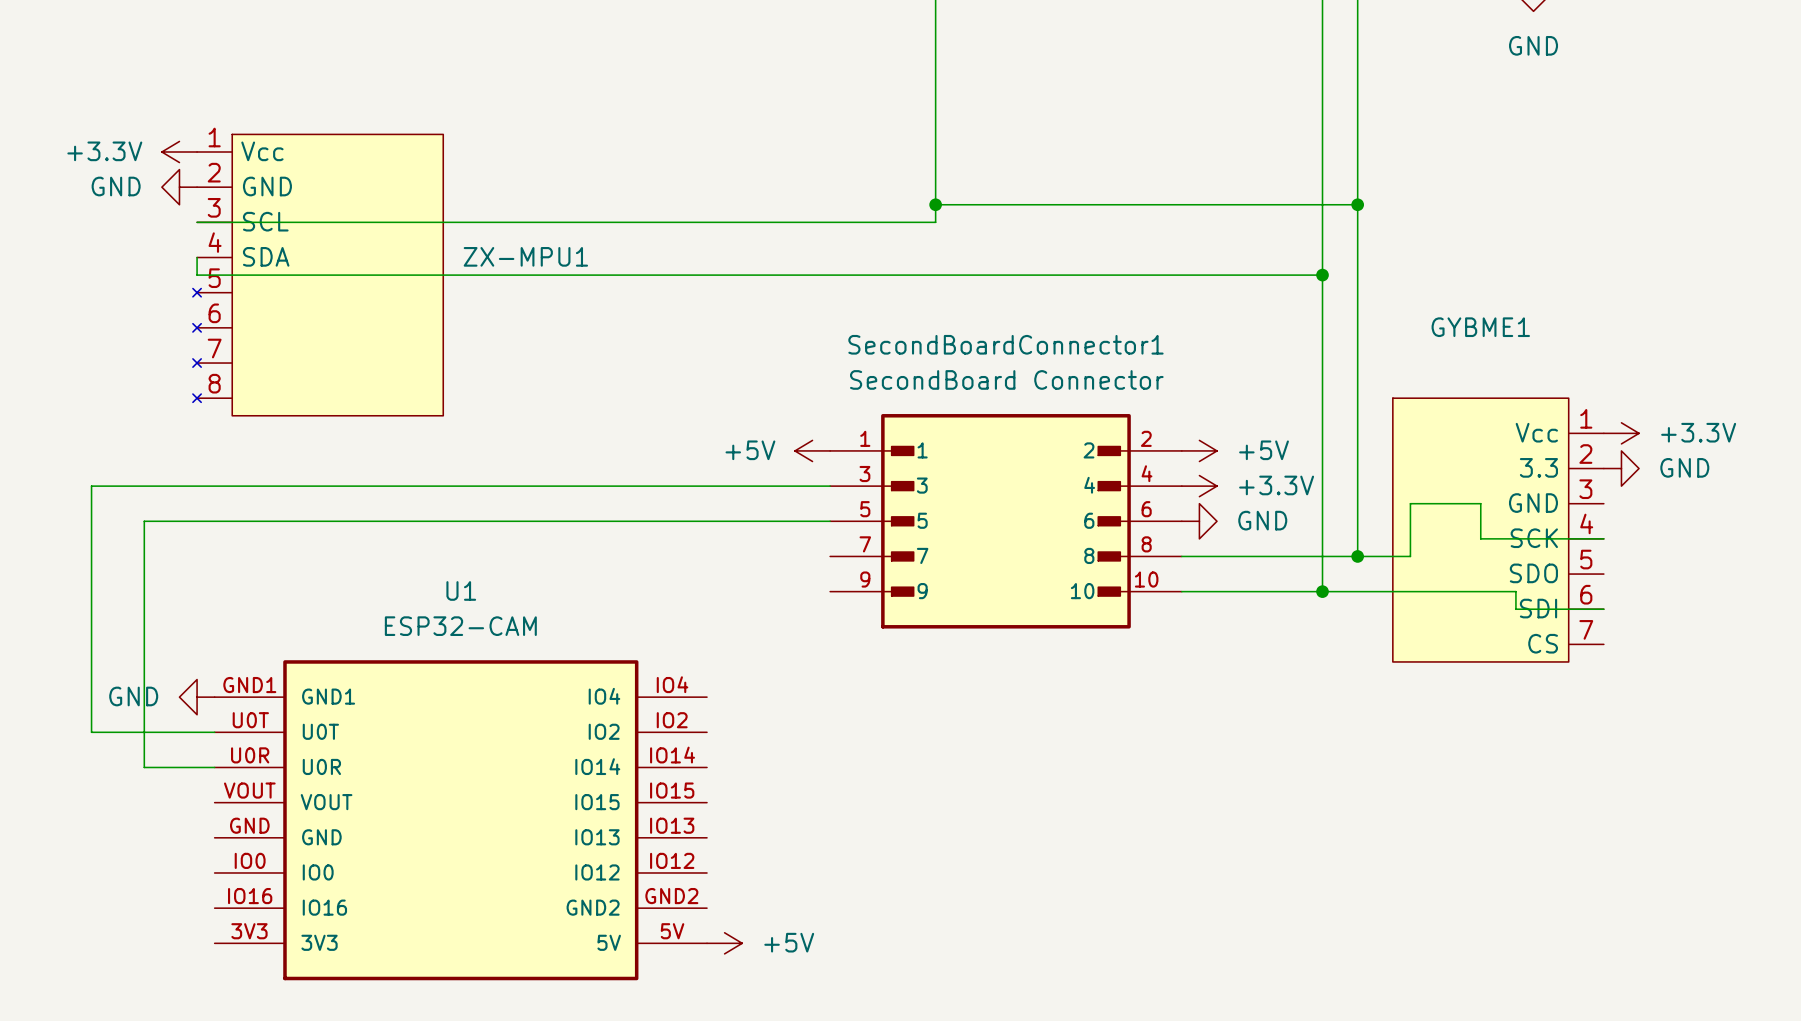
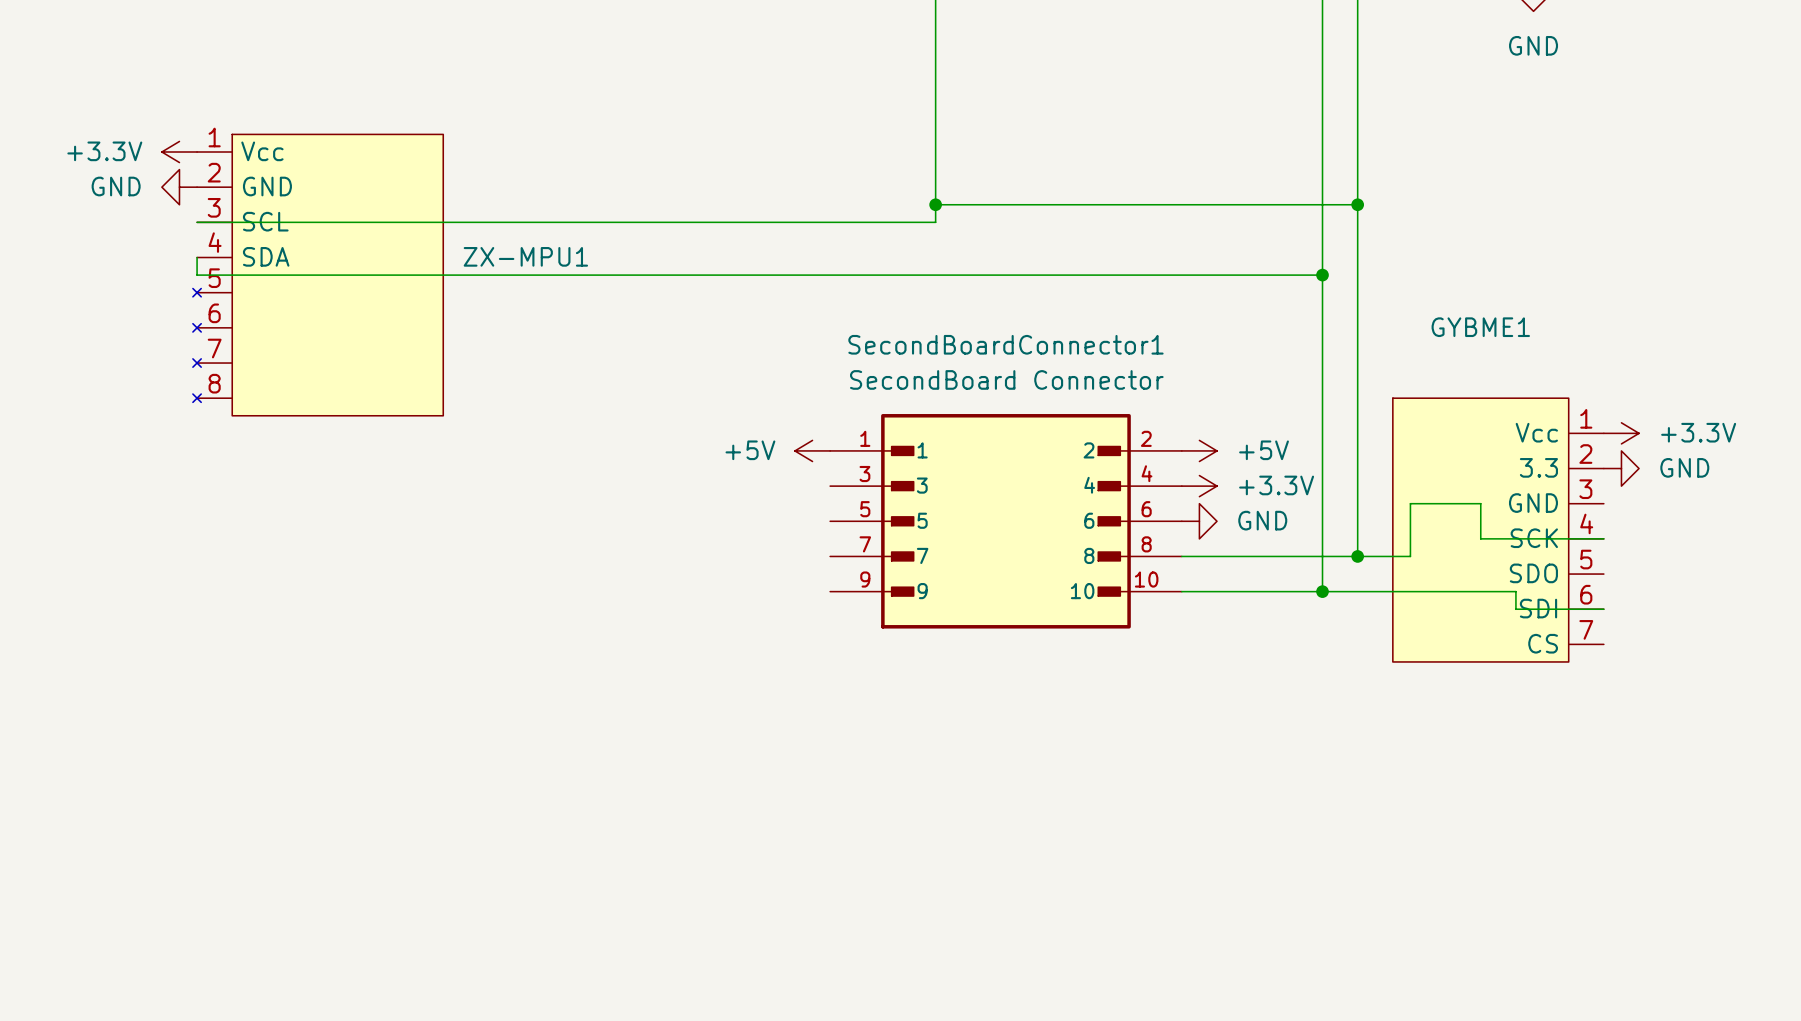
wire: (830, 486) (91, 486) (91, 732) (214, 732) -> none
wire: (830, 521) (144, 521) (144, 767) (214, 767) -> none
power symbol: GND (197, 697) -> none
U1: ESP32-CAM (460, 820) -> none
power symbol: +5V (724, 943) -> none

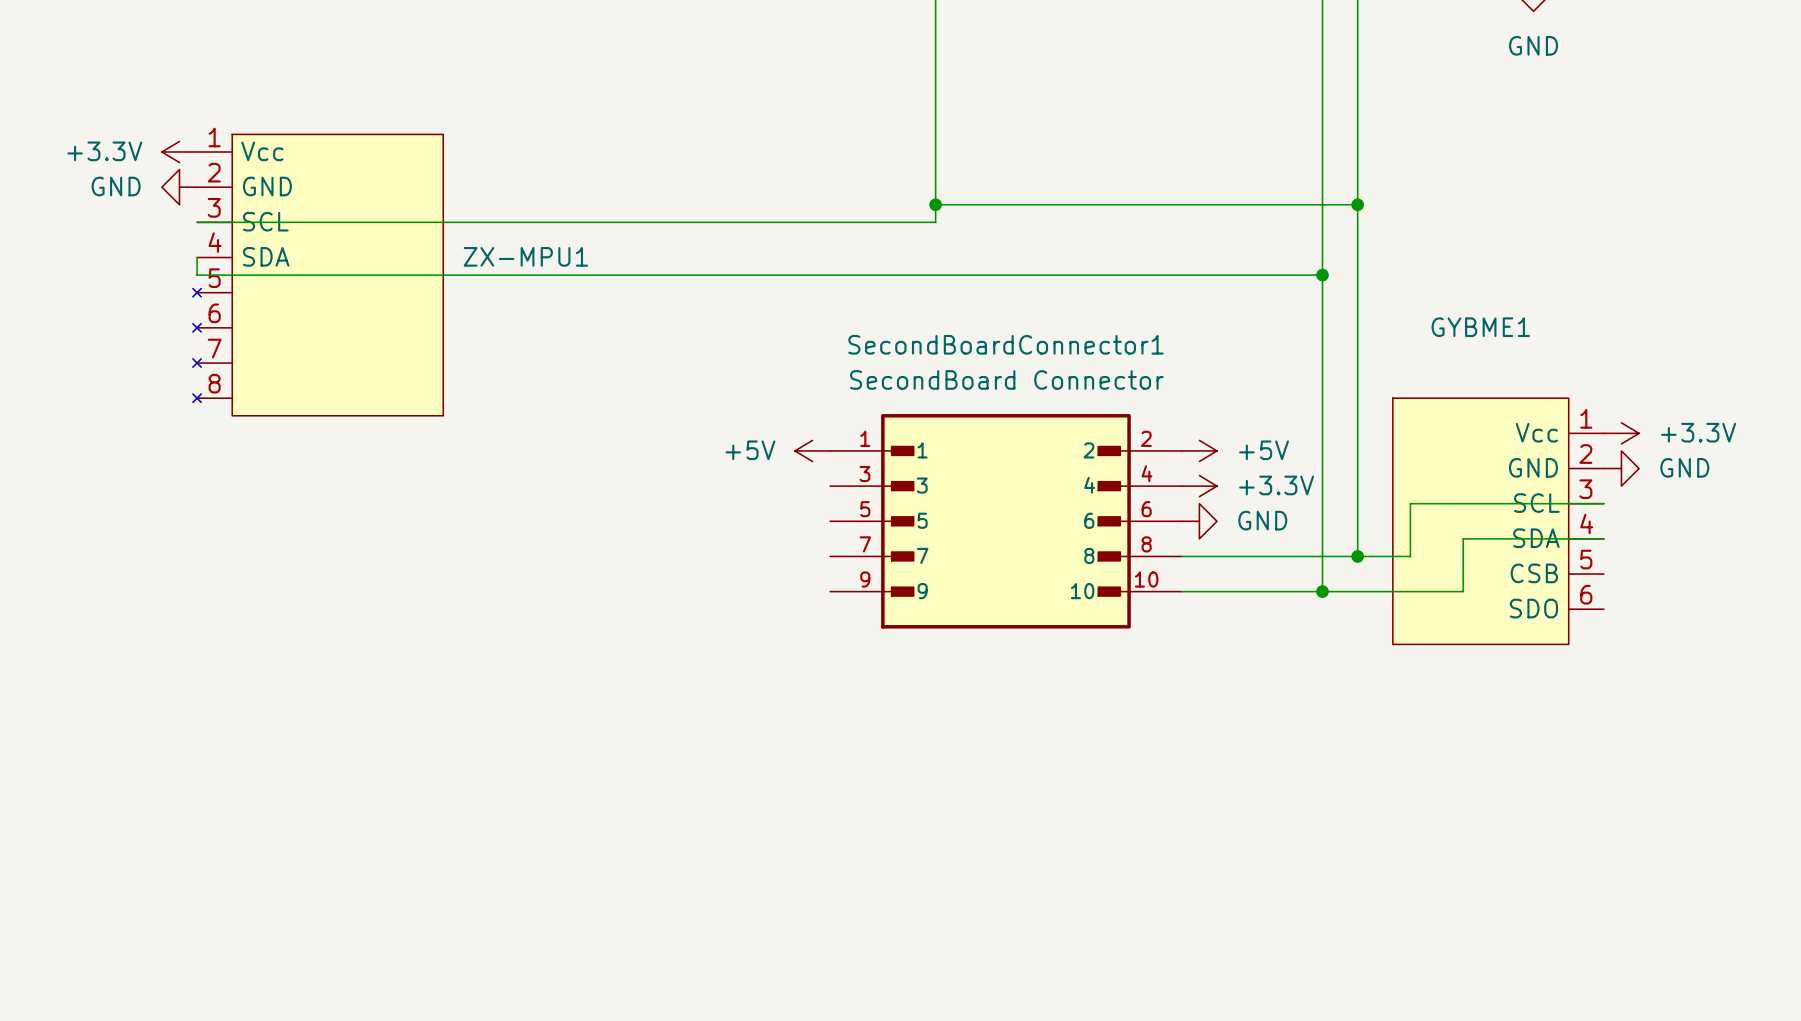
GYBME1 symbol: [1392, 398, 1604, 662] -> [1392, 398, 1604, 645]

